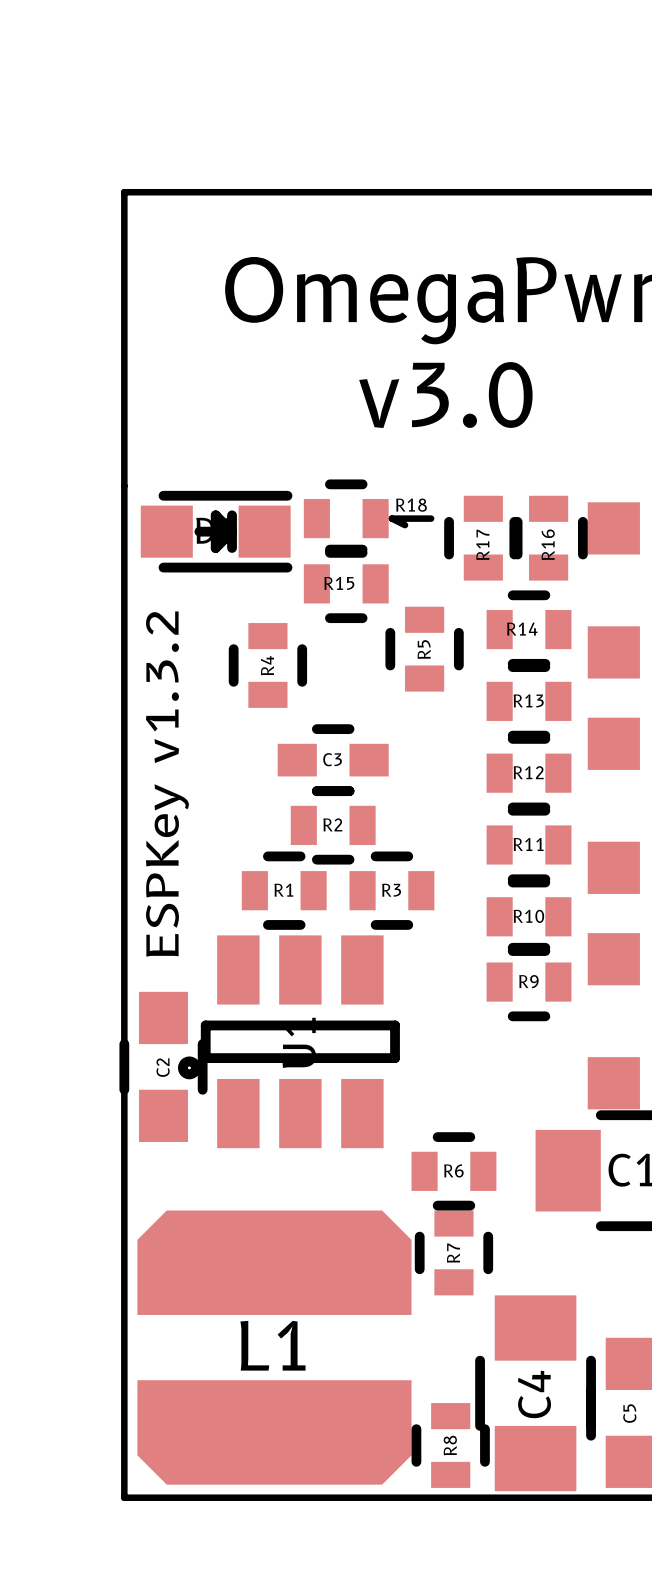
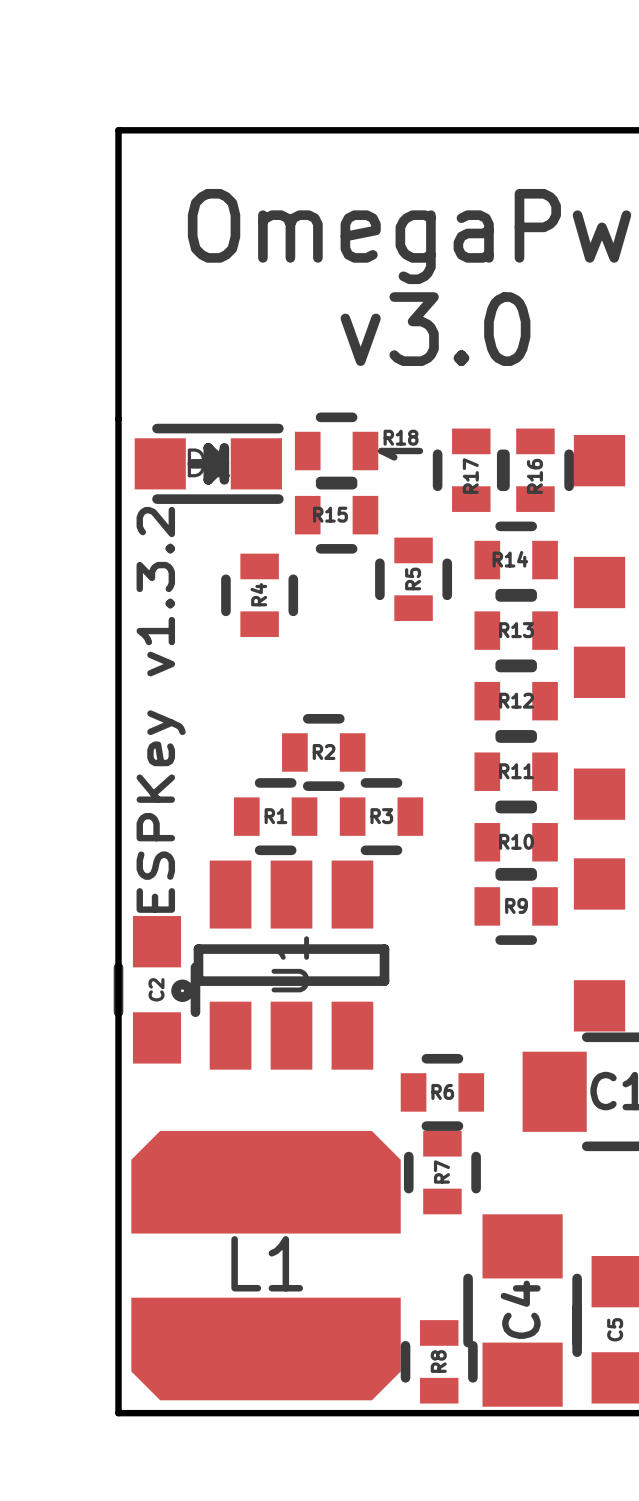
C3: (333, 760) -> none

